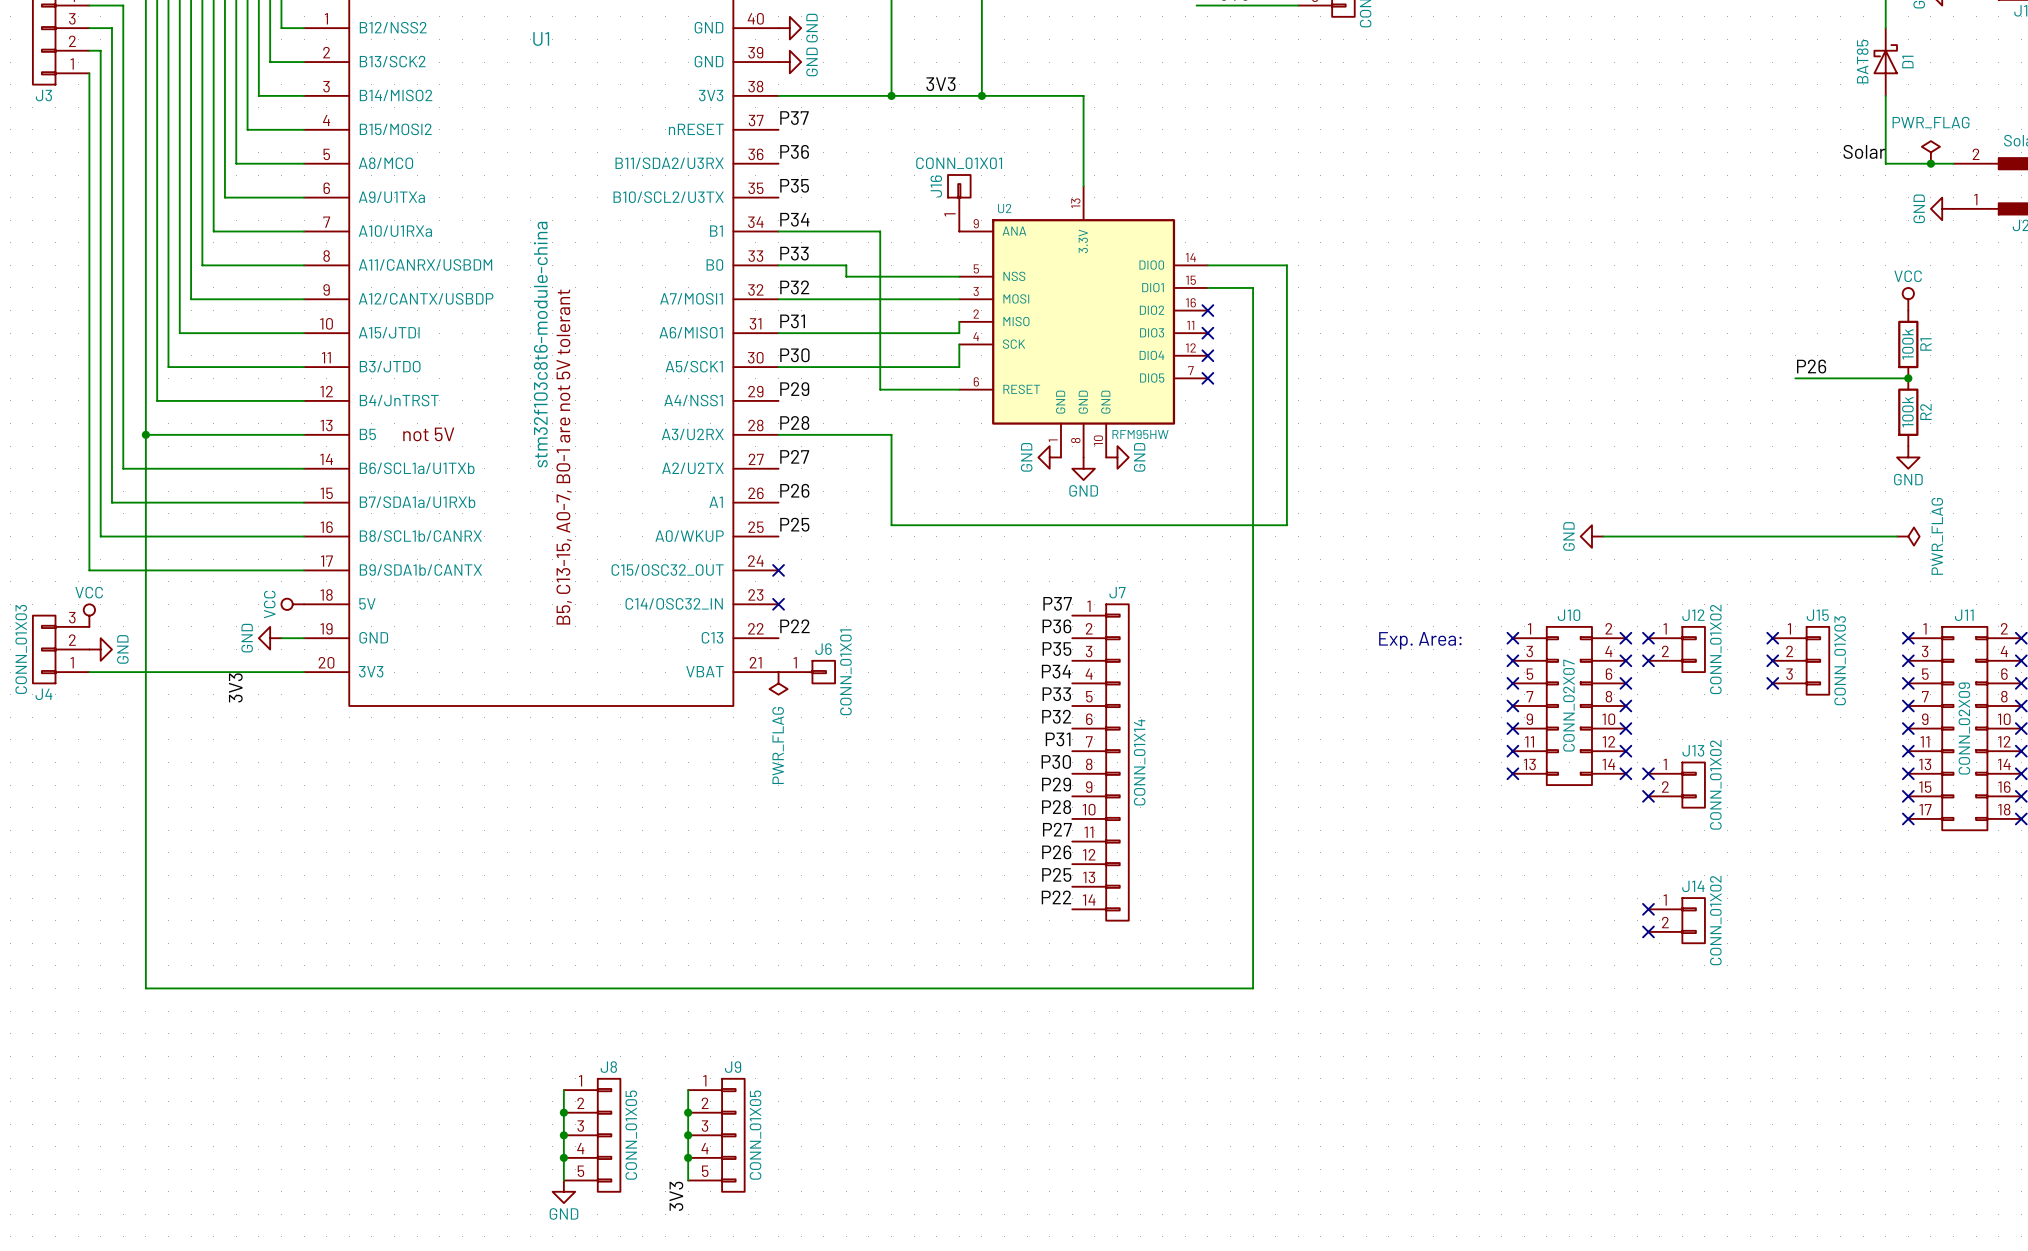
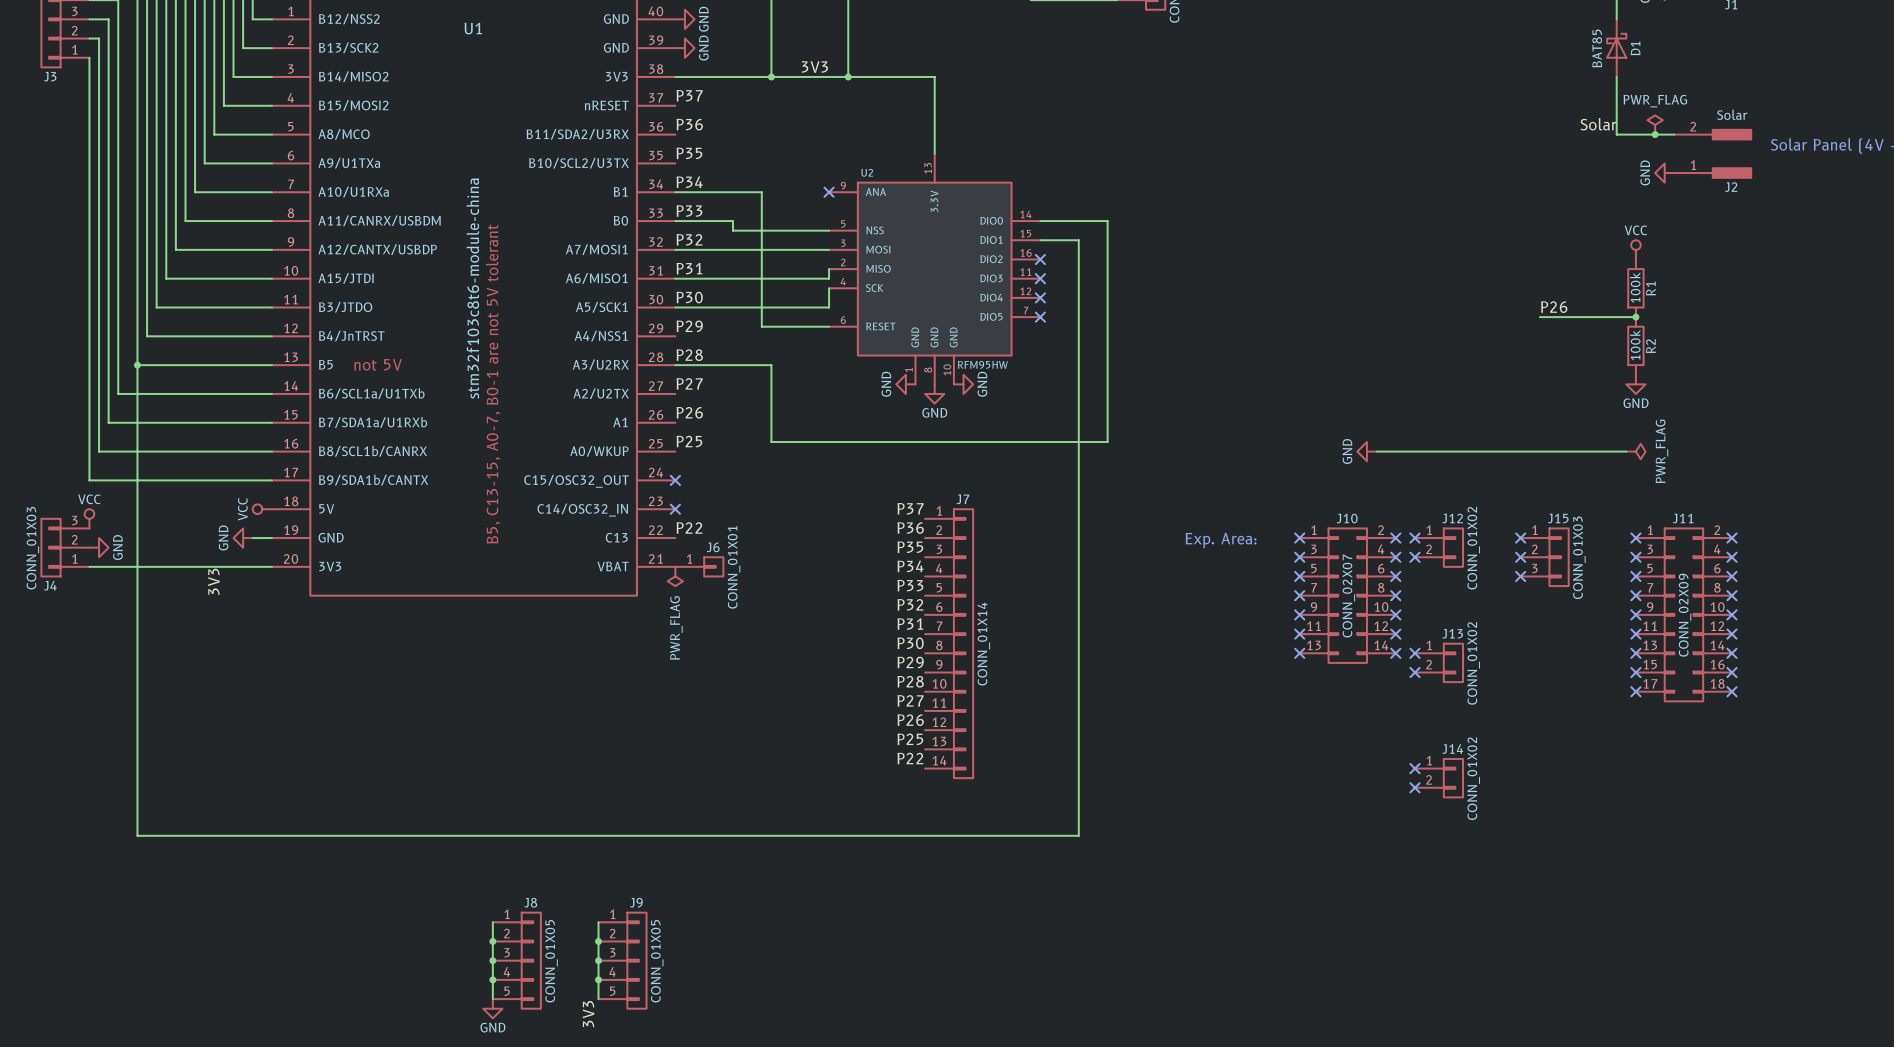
J16: CONN_01X01 (959, 203) -> none
no-connect mark: none -> (829, 192)

